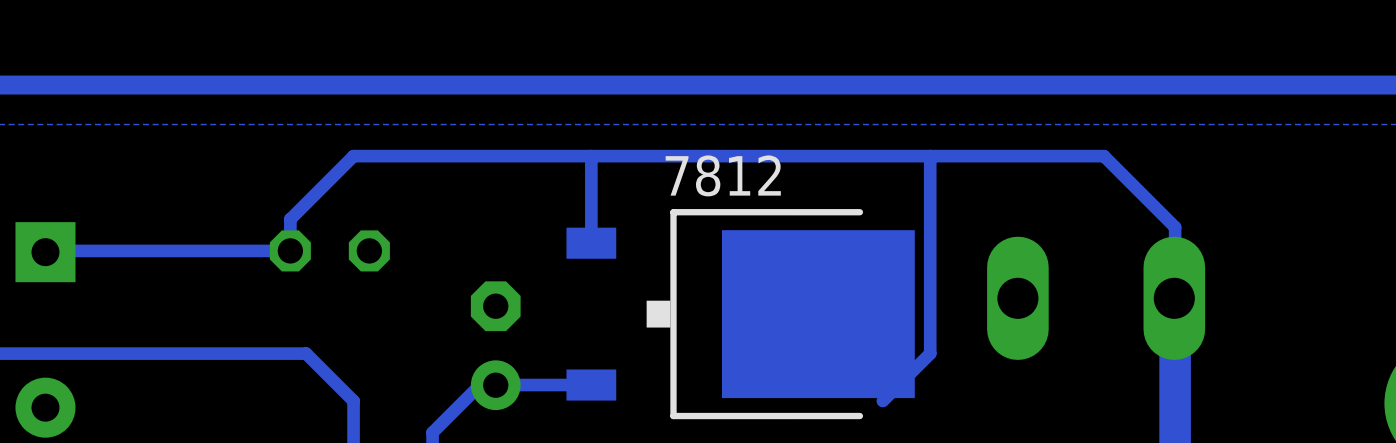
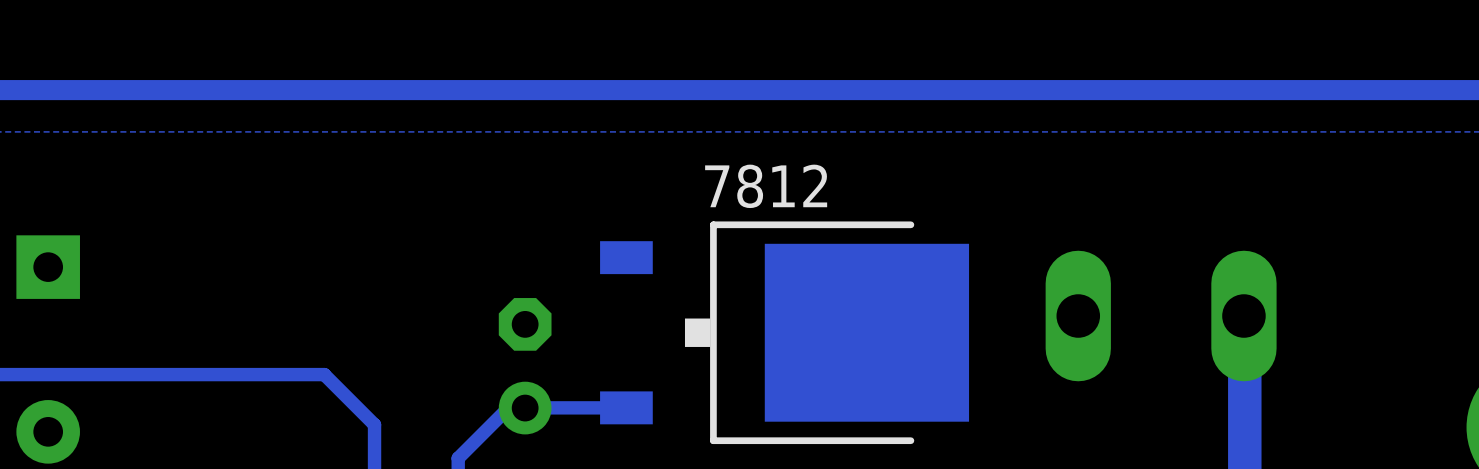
bottom track: (590, 156) (591, 243) -> none
bottom track: (930, 156) (930, 353) (882, 401) -> none
part: (329, 250) -> none
bottom track: (45, 252) (290, 250) (290, 219) (353, 156) (1104, 156) (1175, 227) (1174, 298) -> none

